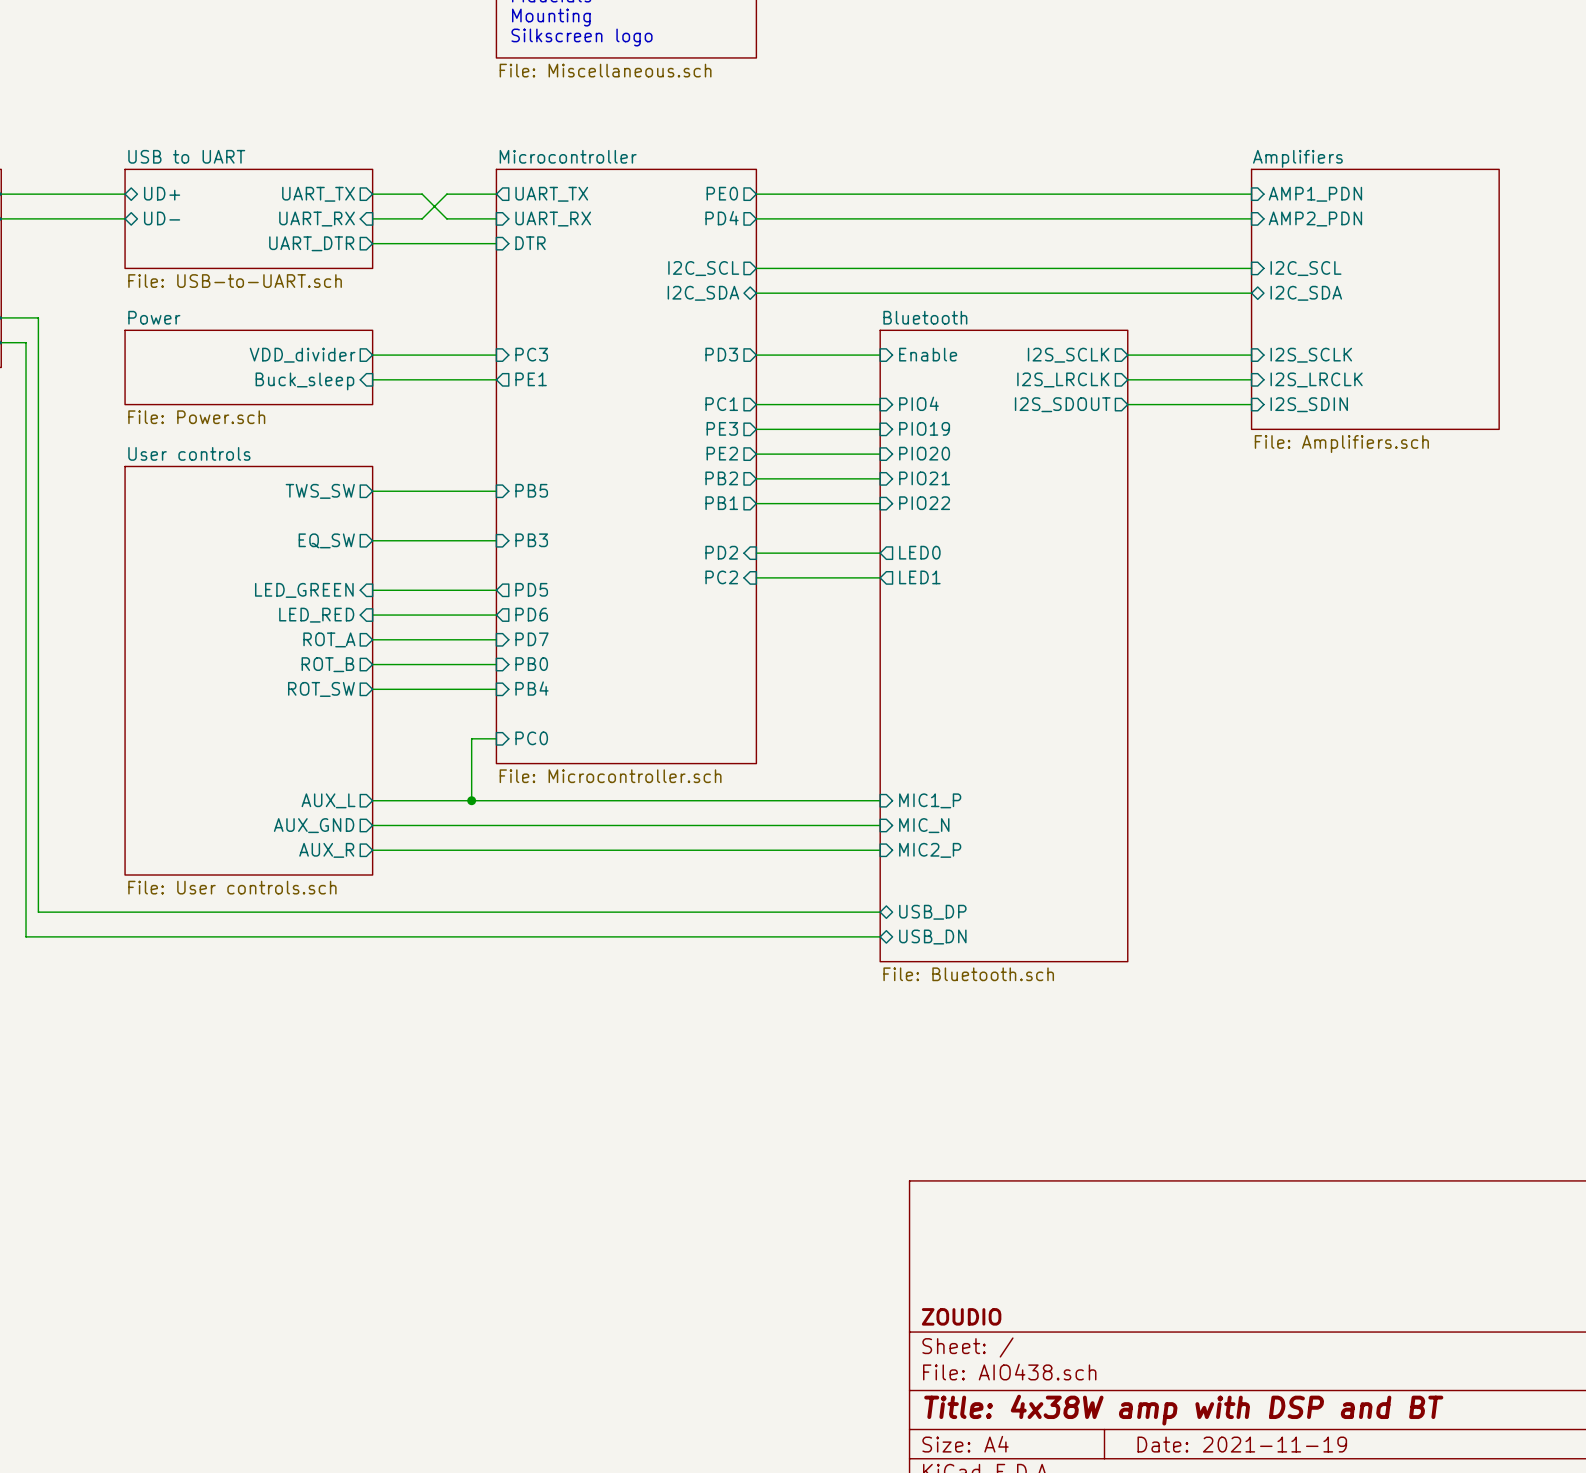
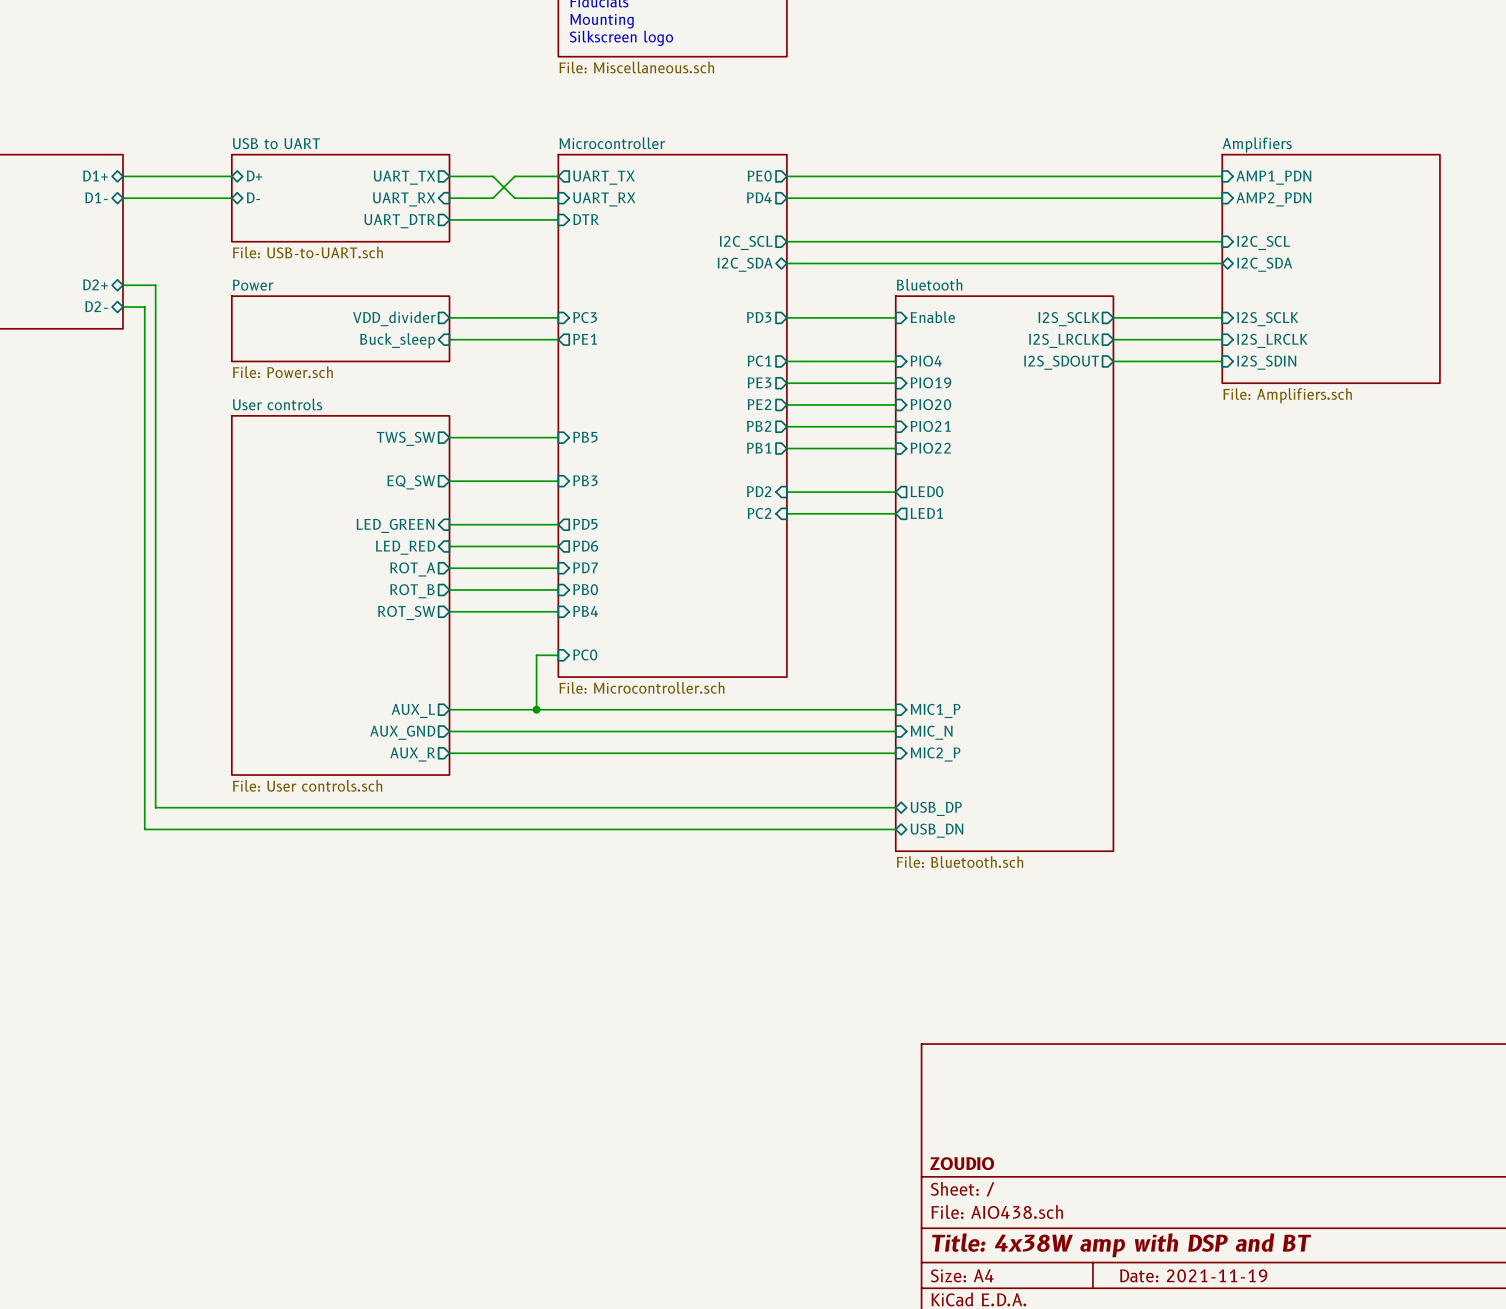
sheet pin: UD+ (162, 193) -> D+ (254, 176)
sheet pin: UD- (162, 218) -> D- (253, 197)

